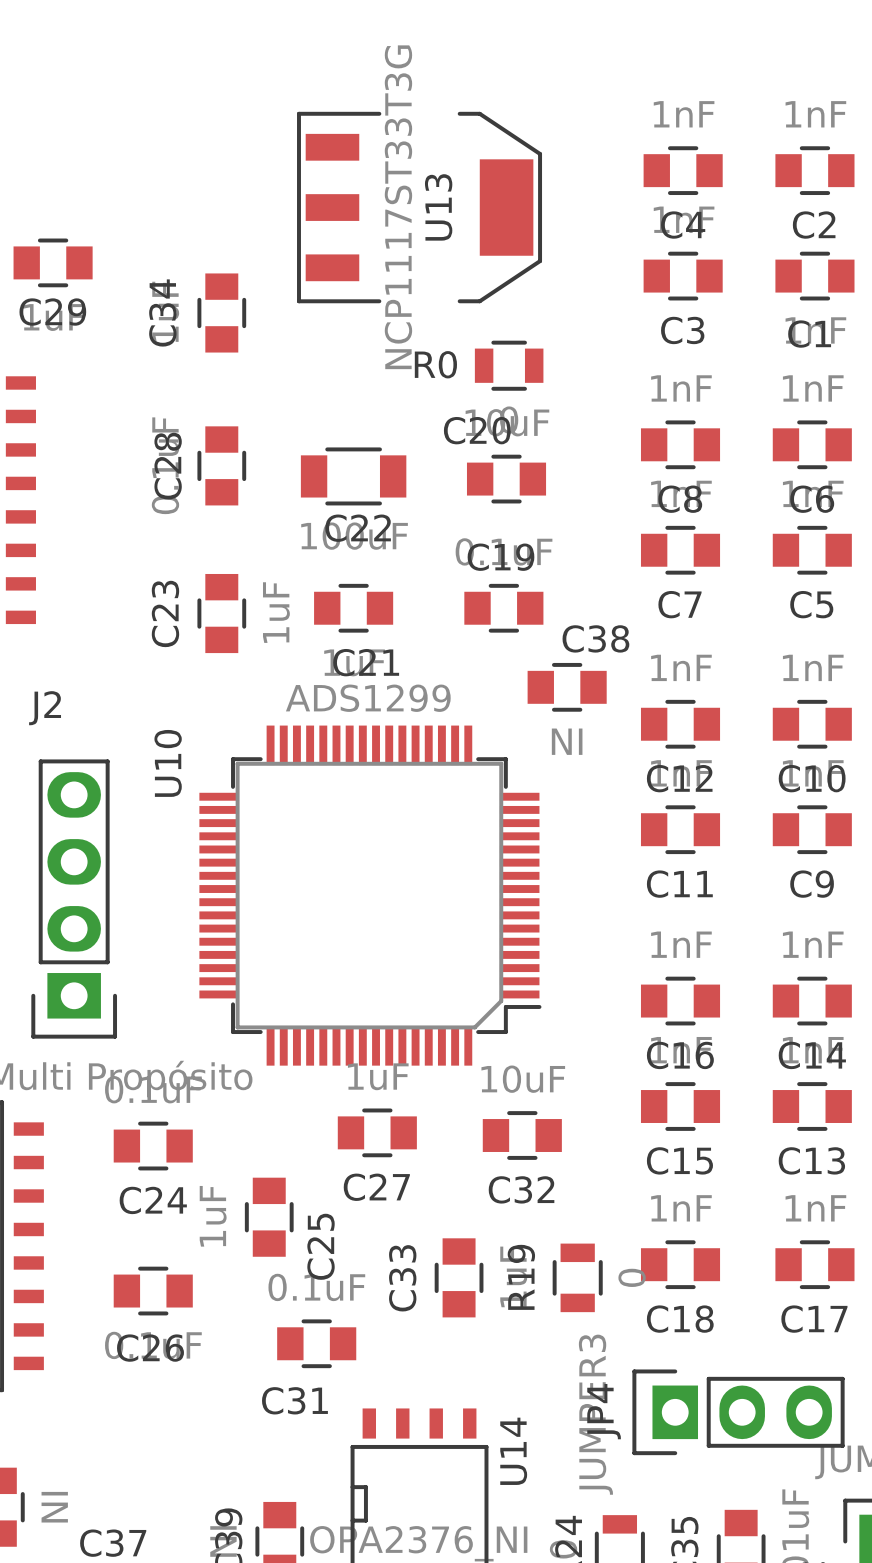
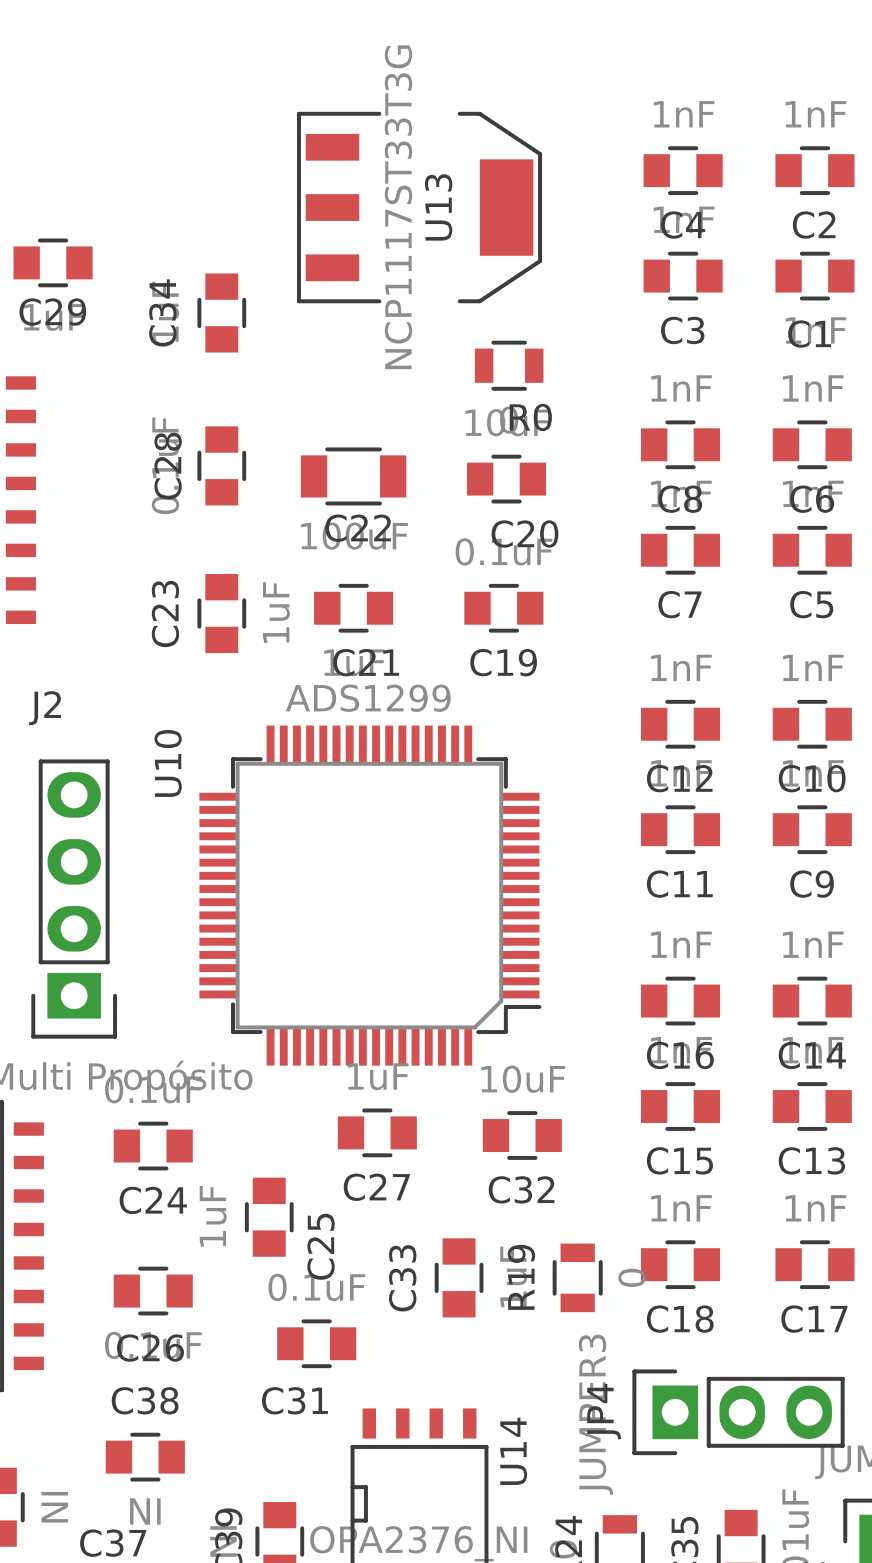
R0 name position: R0 (435, 364) -> R0 (530, 417)
C20 name position: C20 (477, 430) -> C20 (524, 534)
C19 name position: C19 (500, 557) -> C19 (503, 662)
C38 name position: C38 (595, 638) -> C38 (145, 1400)
C38 position: (567, 687) -> (145, 1457)

